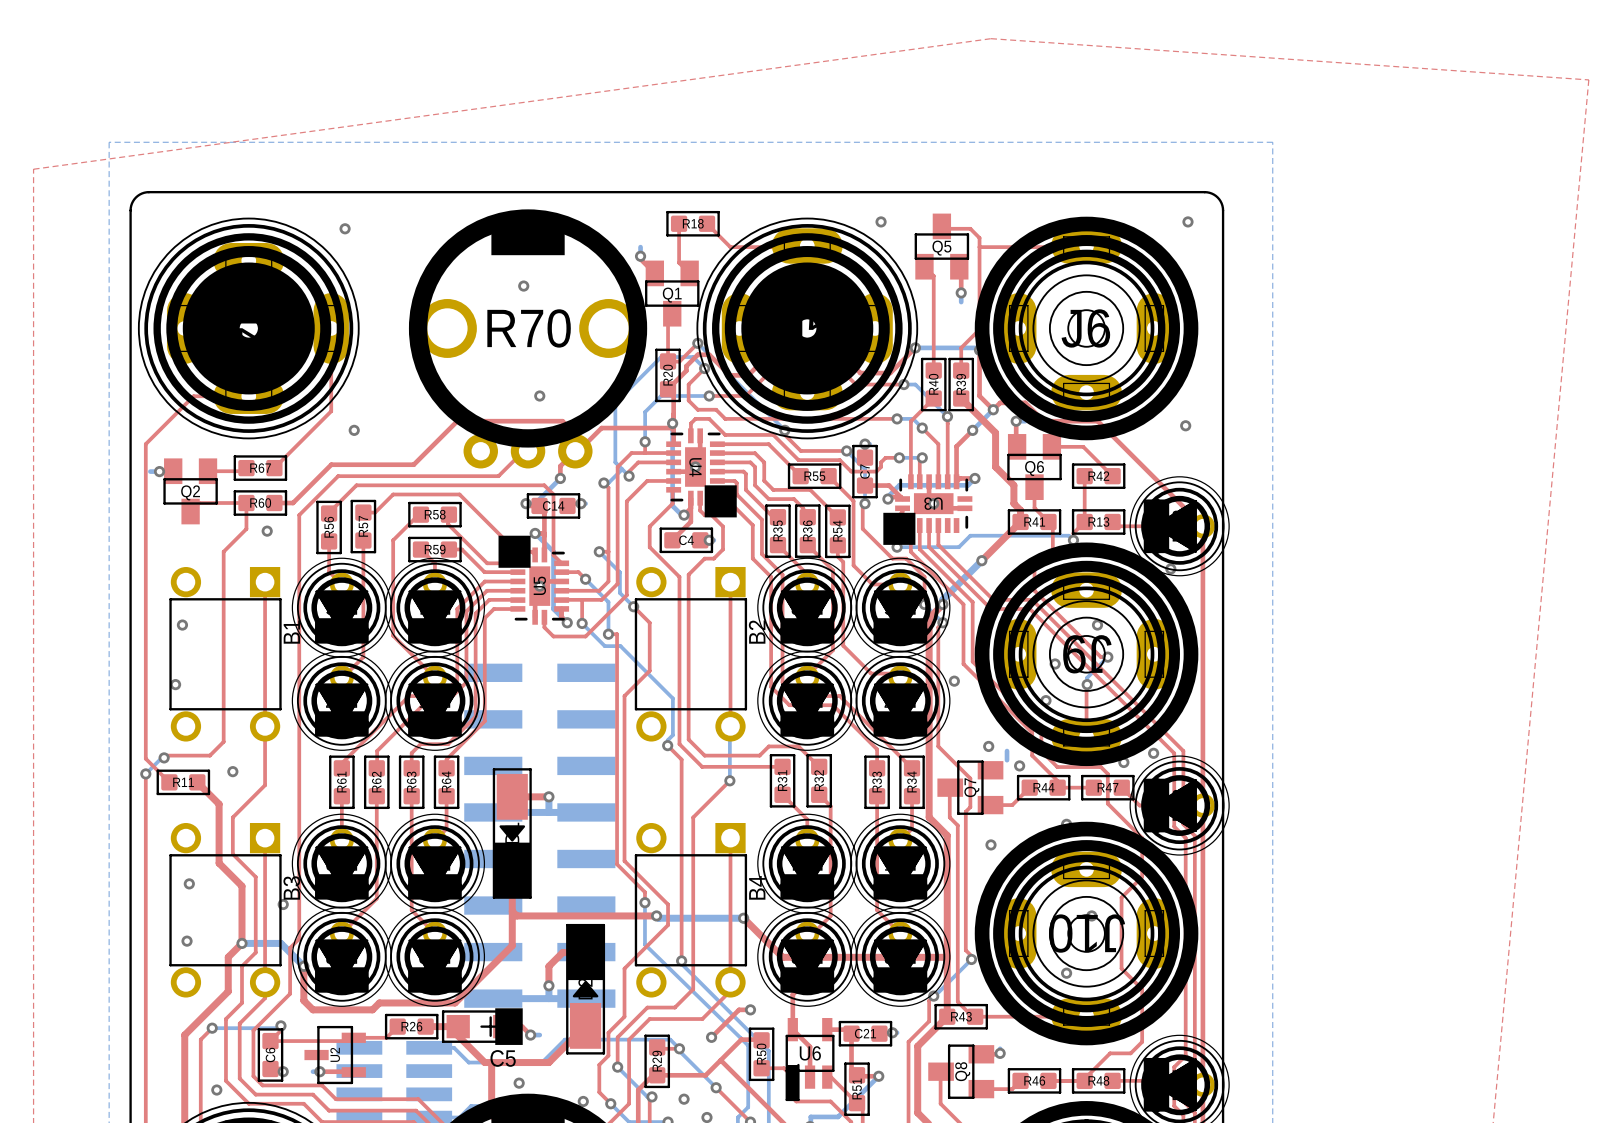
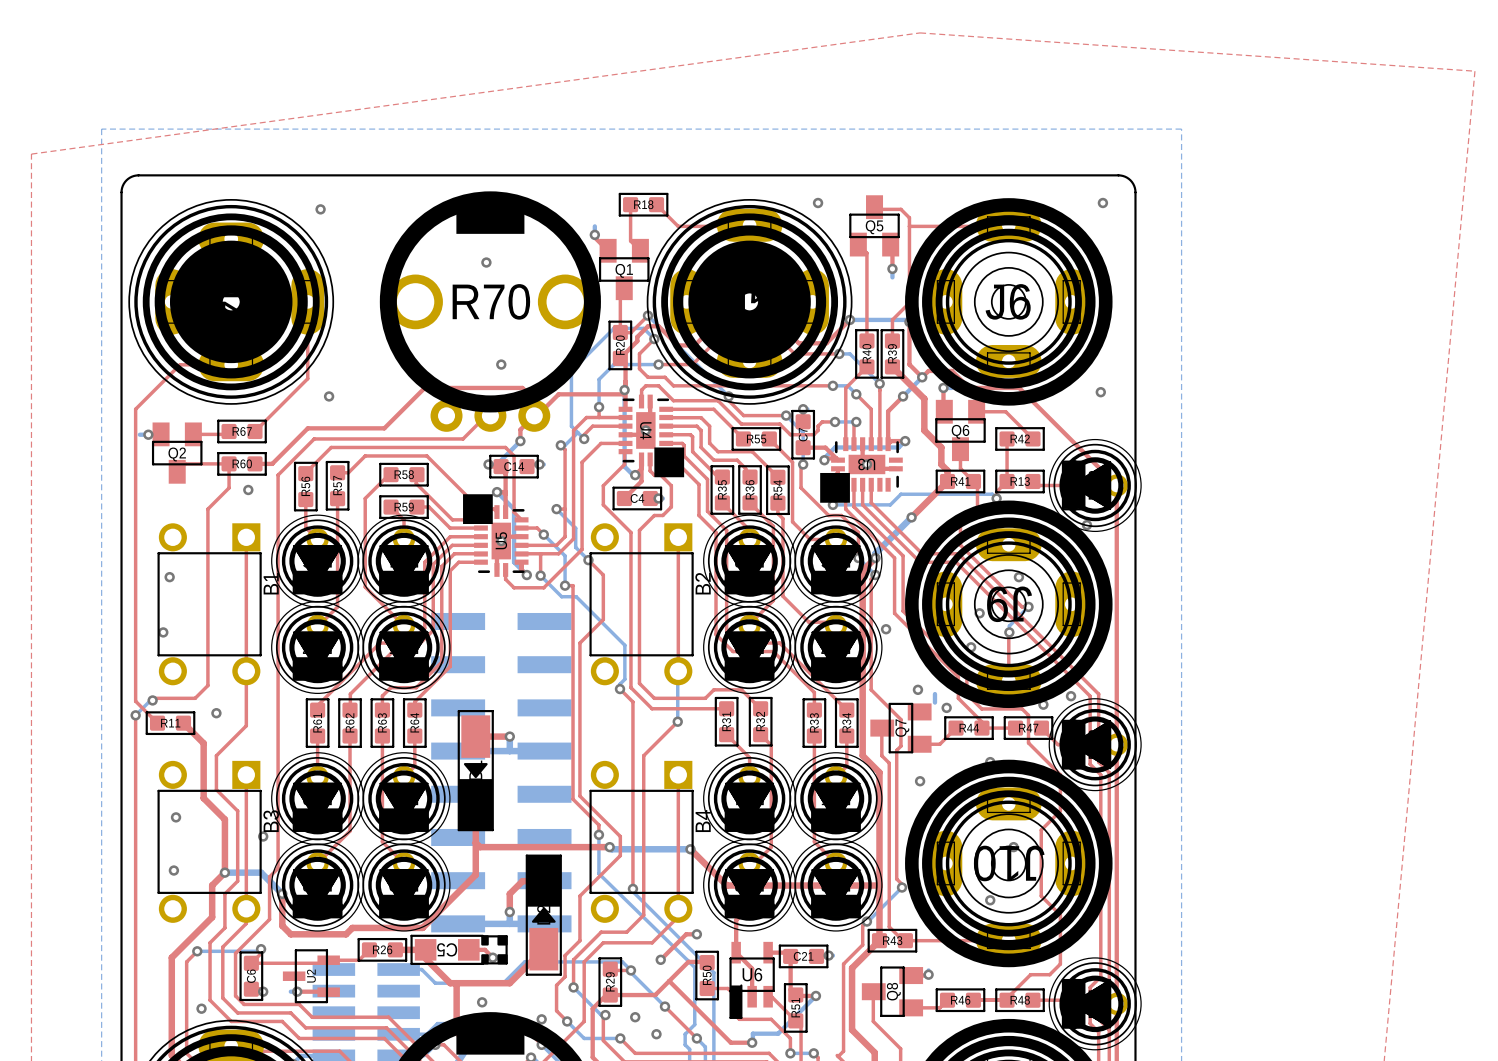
C5 footprint: [441, 1008, 523, 1045] -> [410, 934, 508, 965]
C5 name position: C5 (503, 1058) -> C5 (447, 949)

